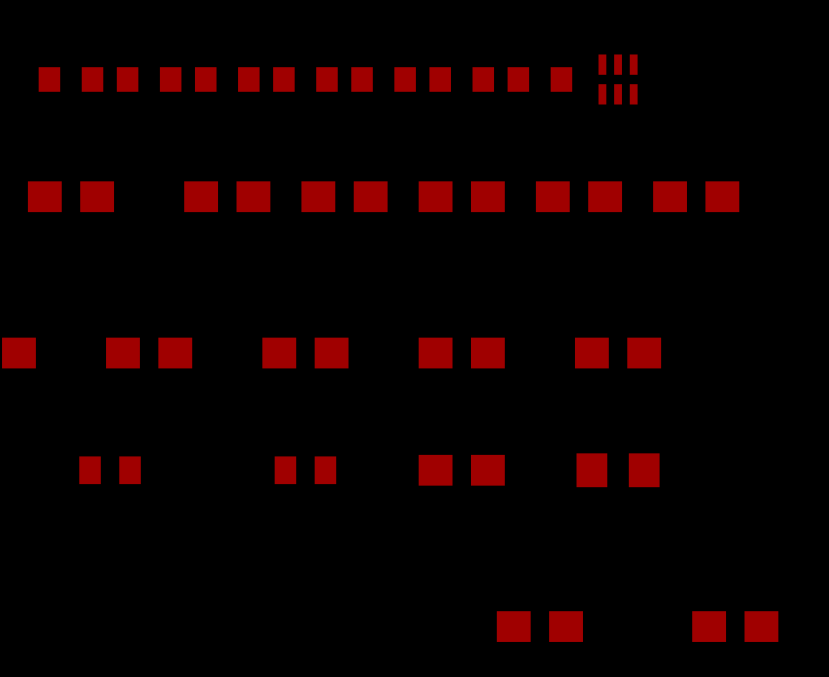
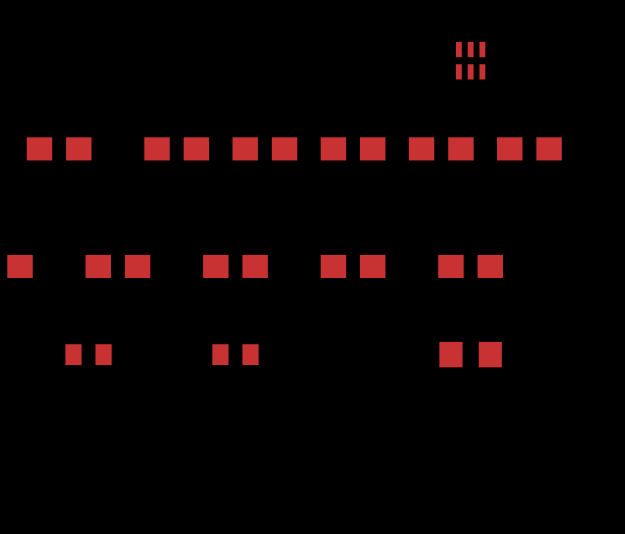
part: (70, 79) -> none
part: (149, 79) -> none
part: (227, 79) -> none
part: (305, 79) -> none
part: (383, 79) -> none
part: (461, 79) -> none
part: (539, 79) -> none
part: (461, 470) -> none
part: (539, 626) -> none
part: (735, 626) -> none

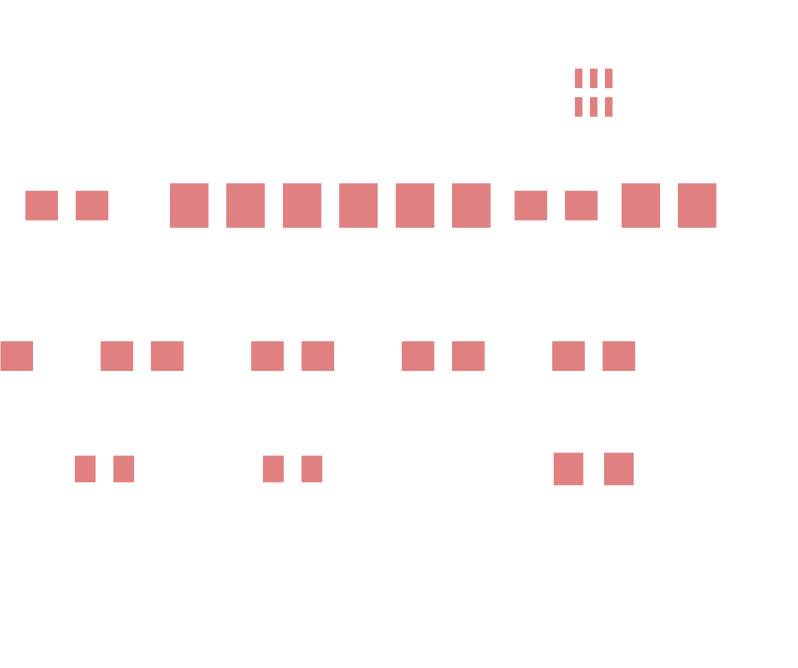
part footprint: [144, 137, 210, 161] -> [169, 183, 265, 228]
part footprint: [232, 137, 298, 161] -> [282, 183, 378, 228]
part footprint: [320, 137, 386, 161] -> [395, 183, 491, 228]
part footprint: [497, 137, 562, 161] -> [621, 183, 717, 228]

